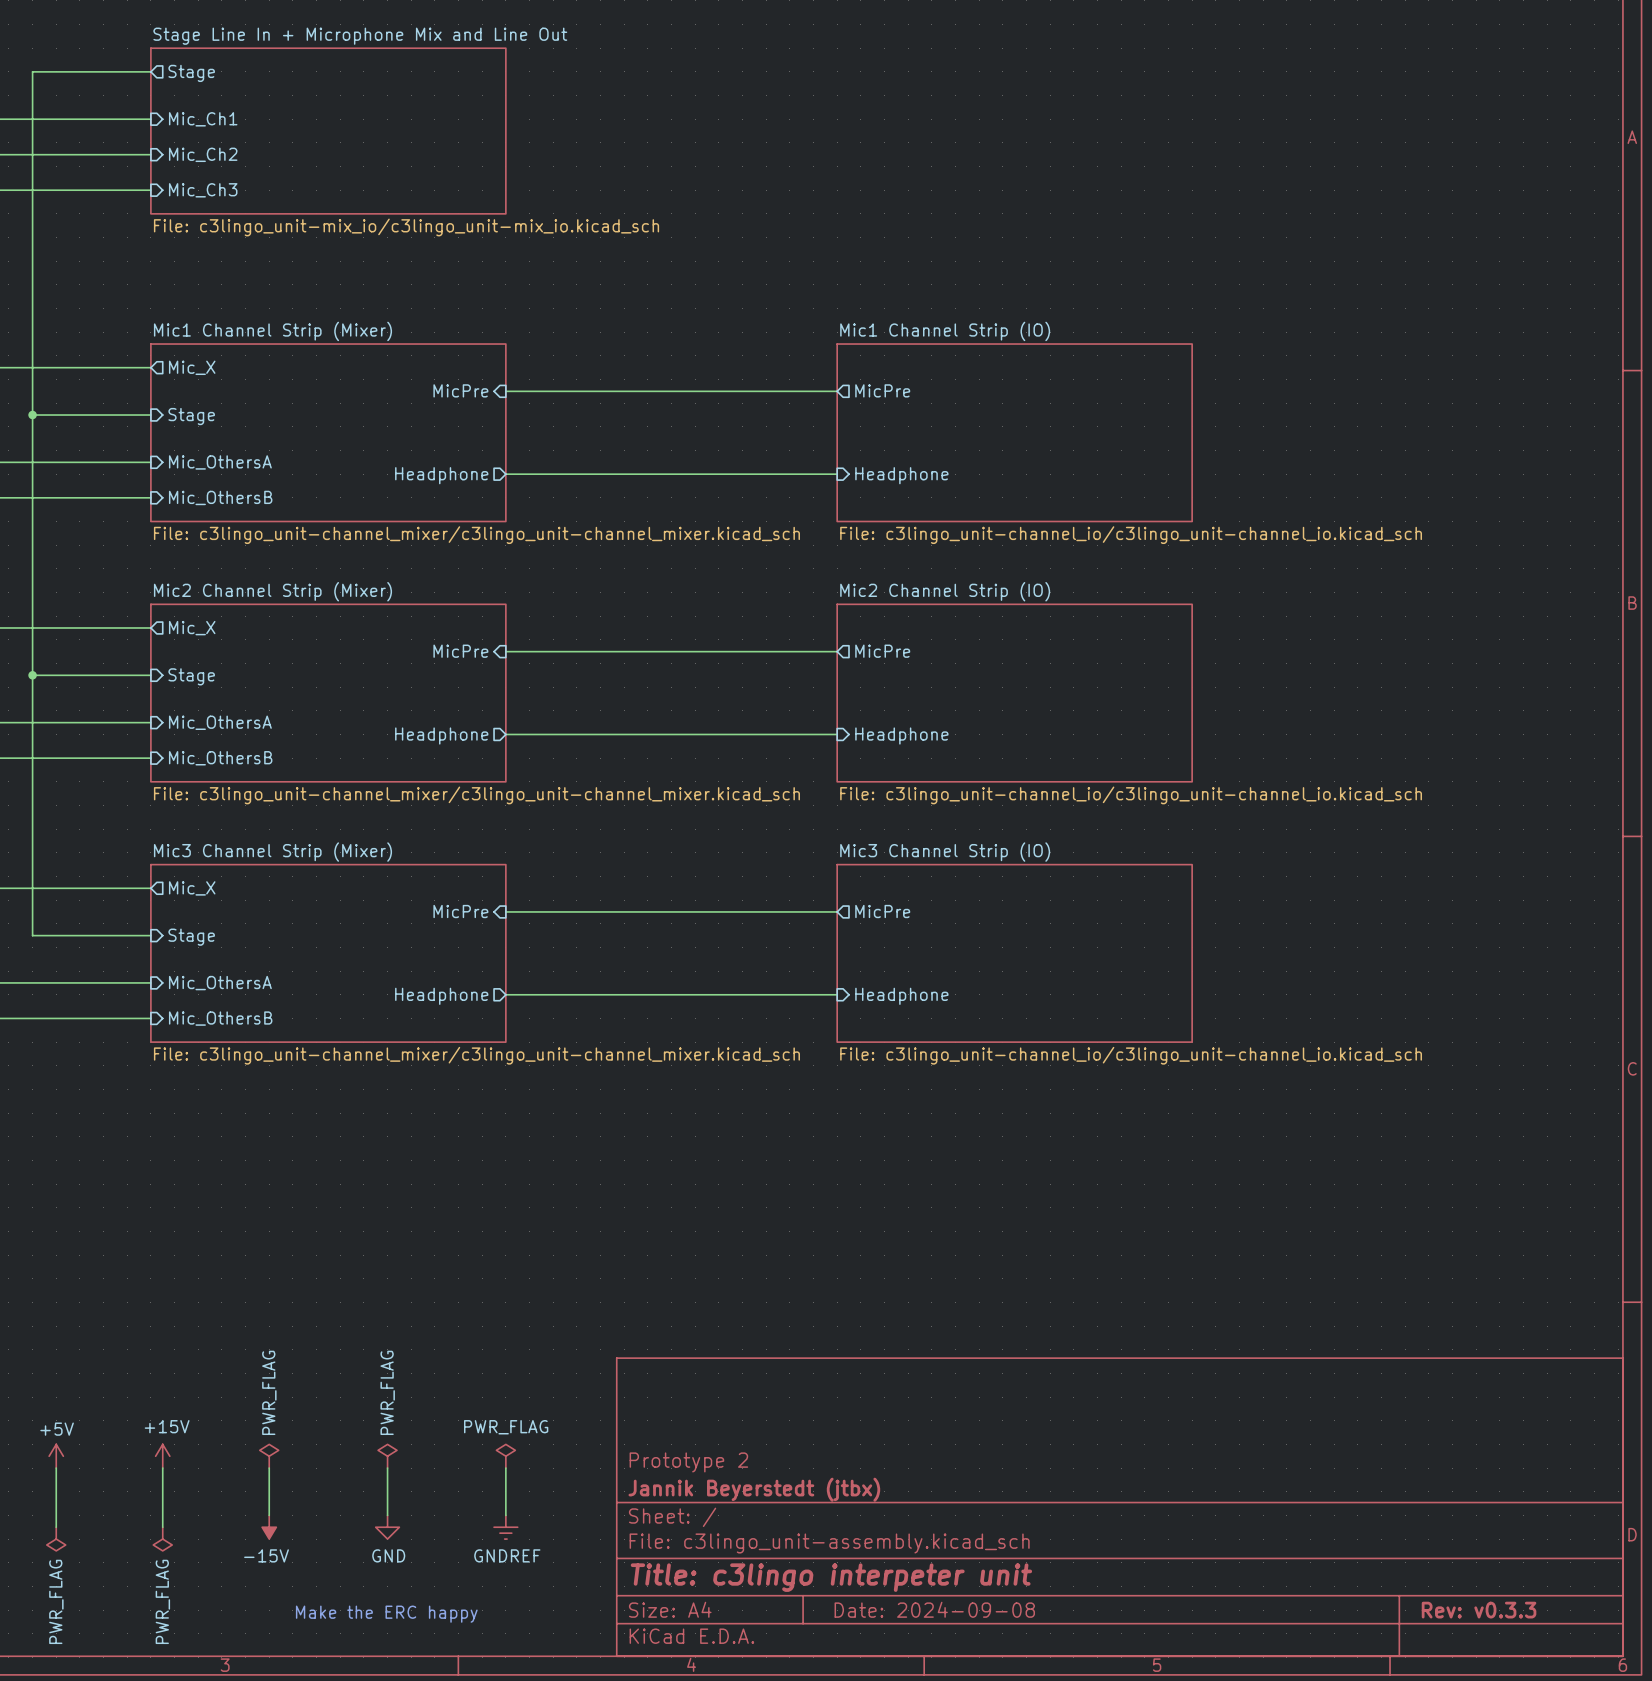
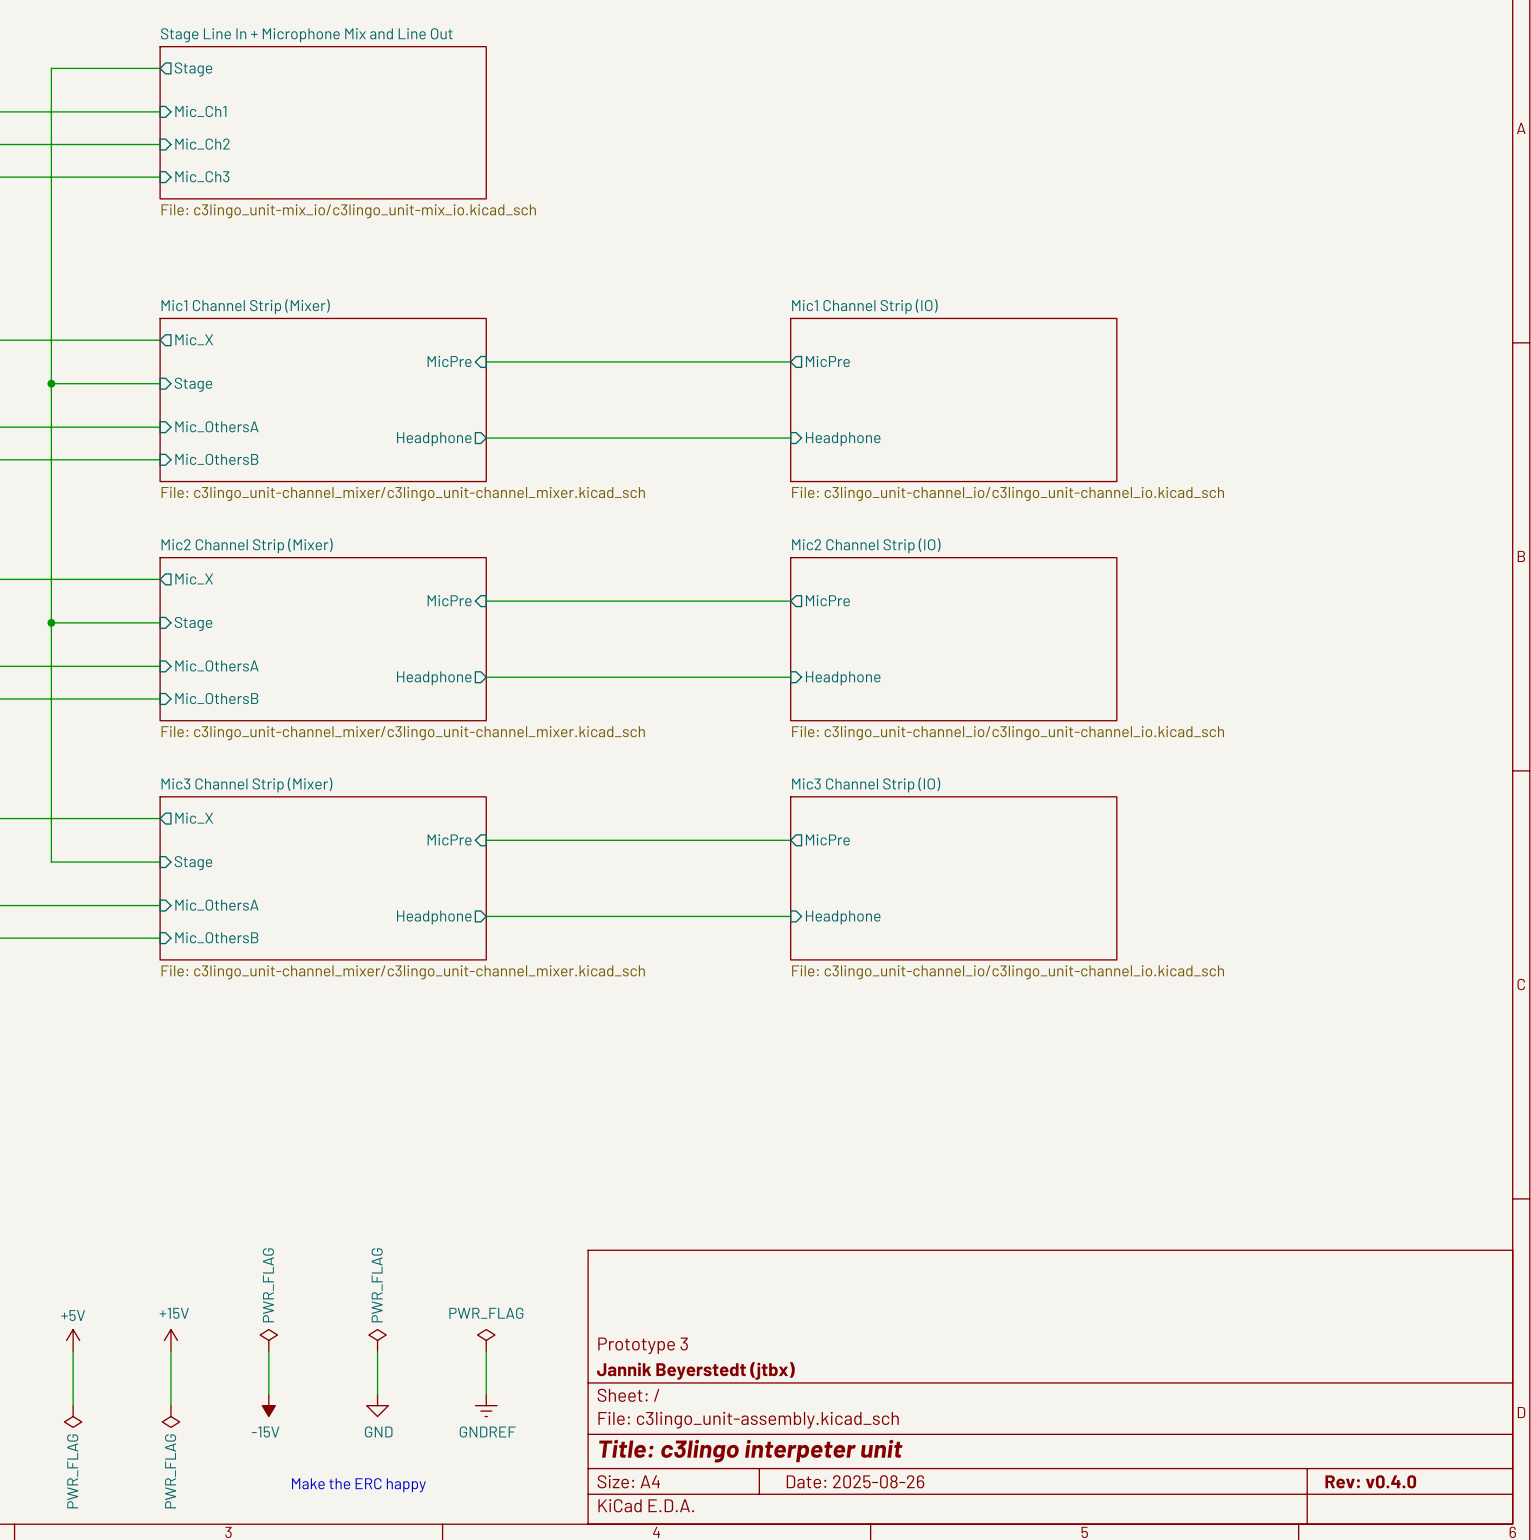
title block: Prototype 2 (688, 1462) -> Prototype 3 (643, 1345)
title block: Date: 2024-09-08 (934, 1609) -> Date: 2025-08-26 (855, 1481)
title block: Rev: v0.3.3 (1479, 1610) -> Rev: v0.4.0 (1370, 1481)

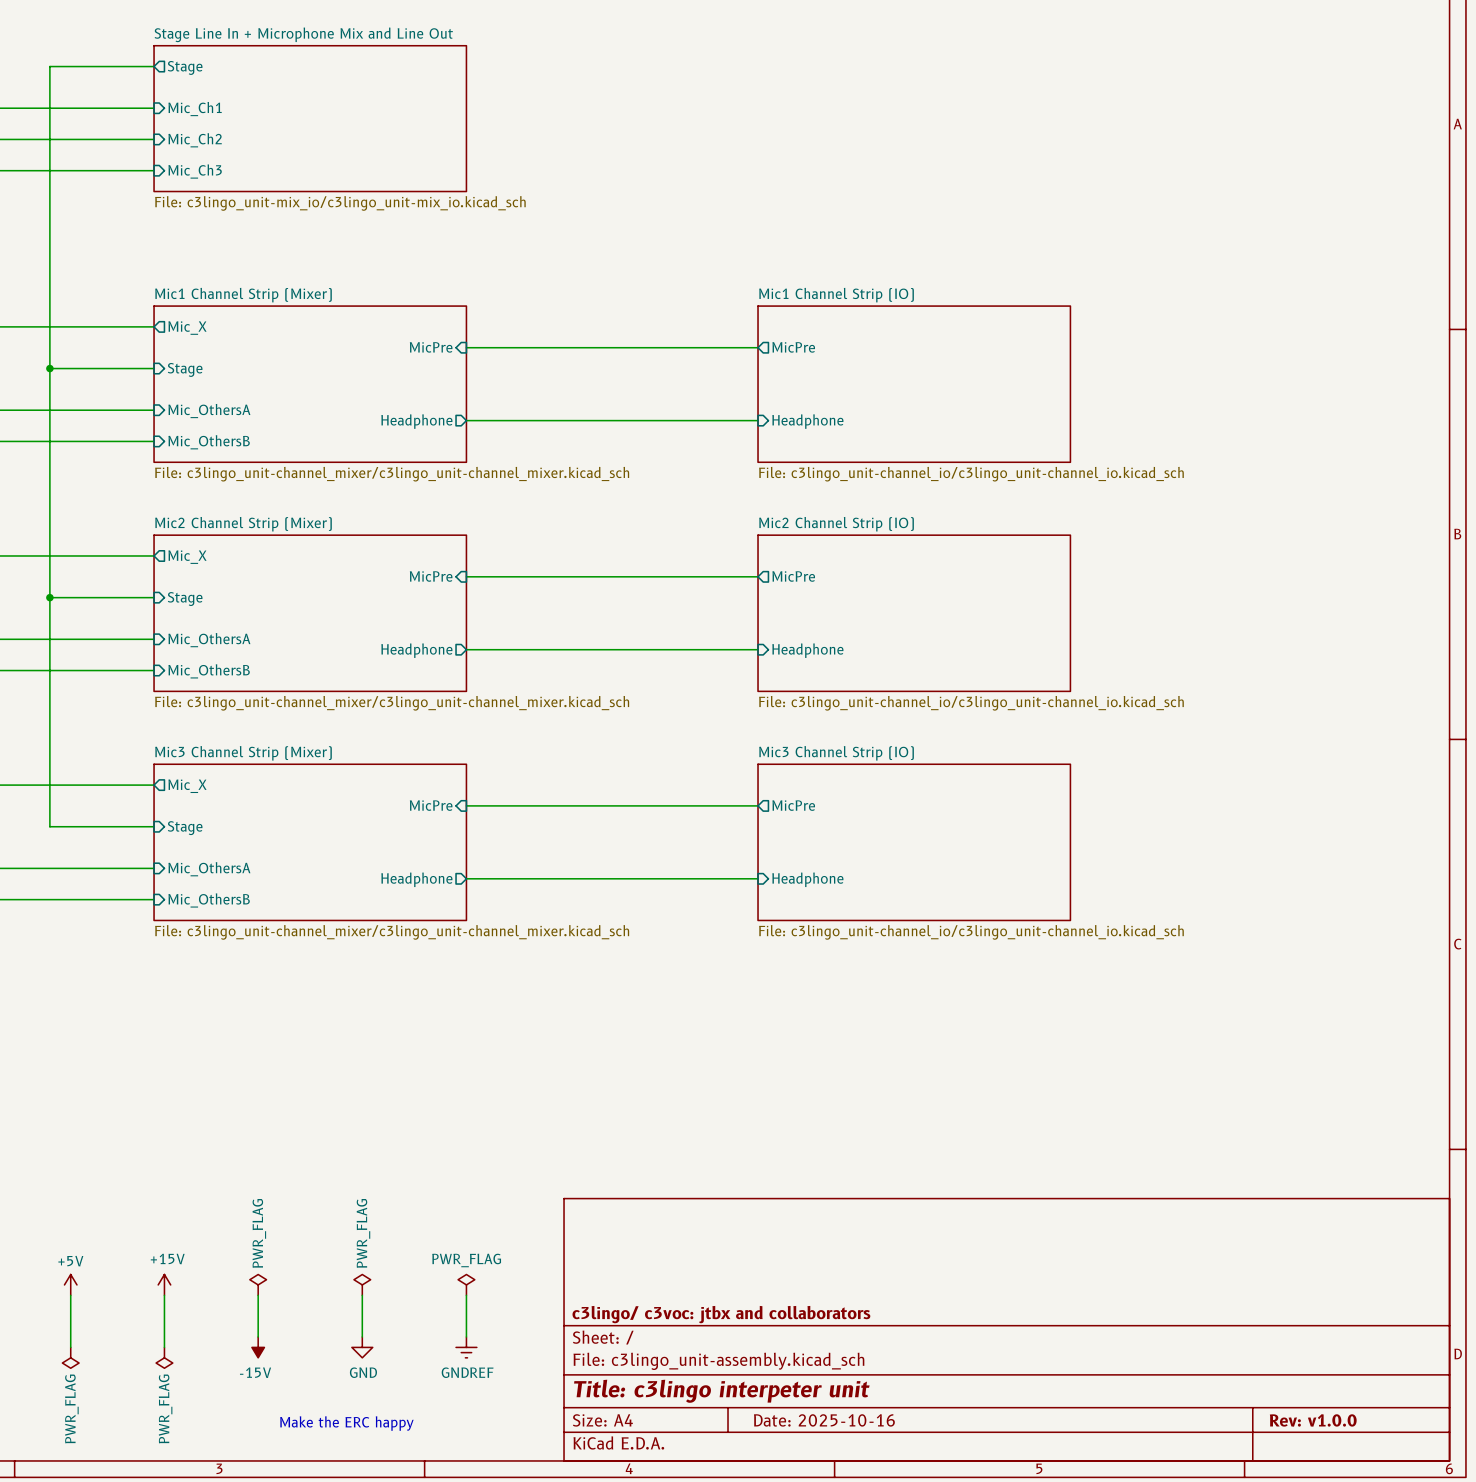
title block: Prototype 3 (643, 1345) -> none
title block: Jannik Beyerstedt (jtbx) (695, 1371) -> c3lingo/ c3voc: jtbx and collaborators (721, 1314)
title block: Date: 2025-08-26 (855, 1481) -> Date: 2025-10-16 (824, 1420)
title block: Rev: v0.4.0 (1370, 1481) -> Rev: v1.0.0 (1313, 1420)

